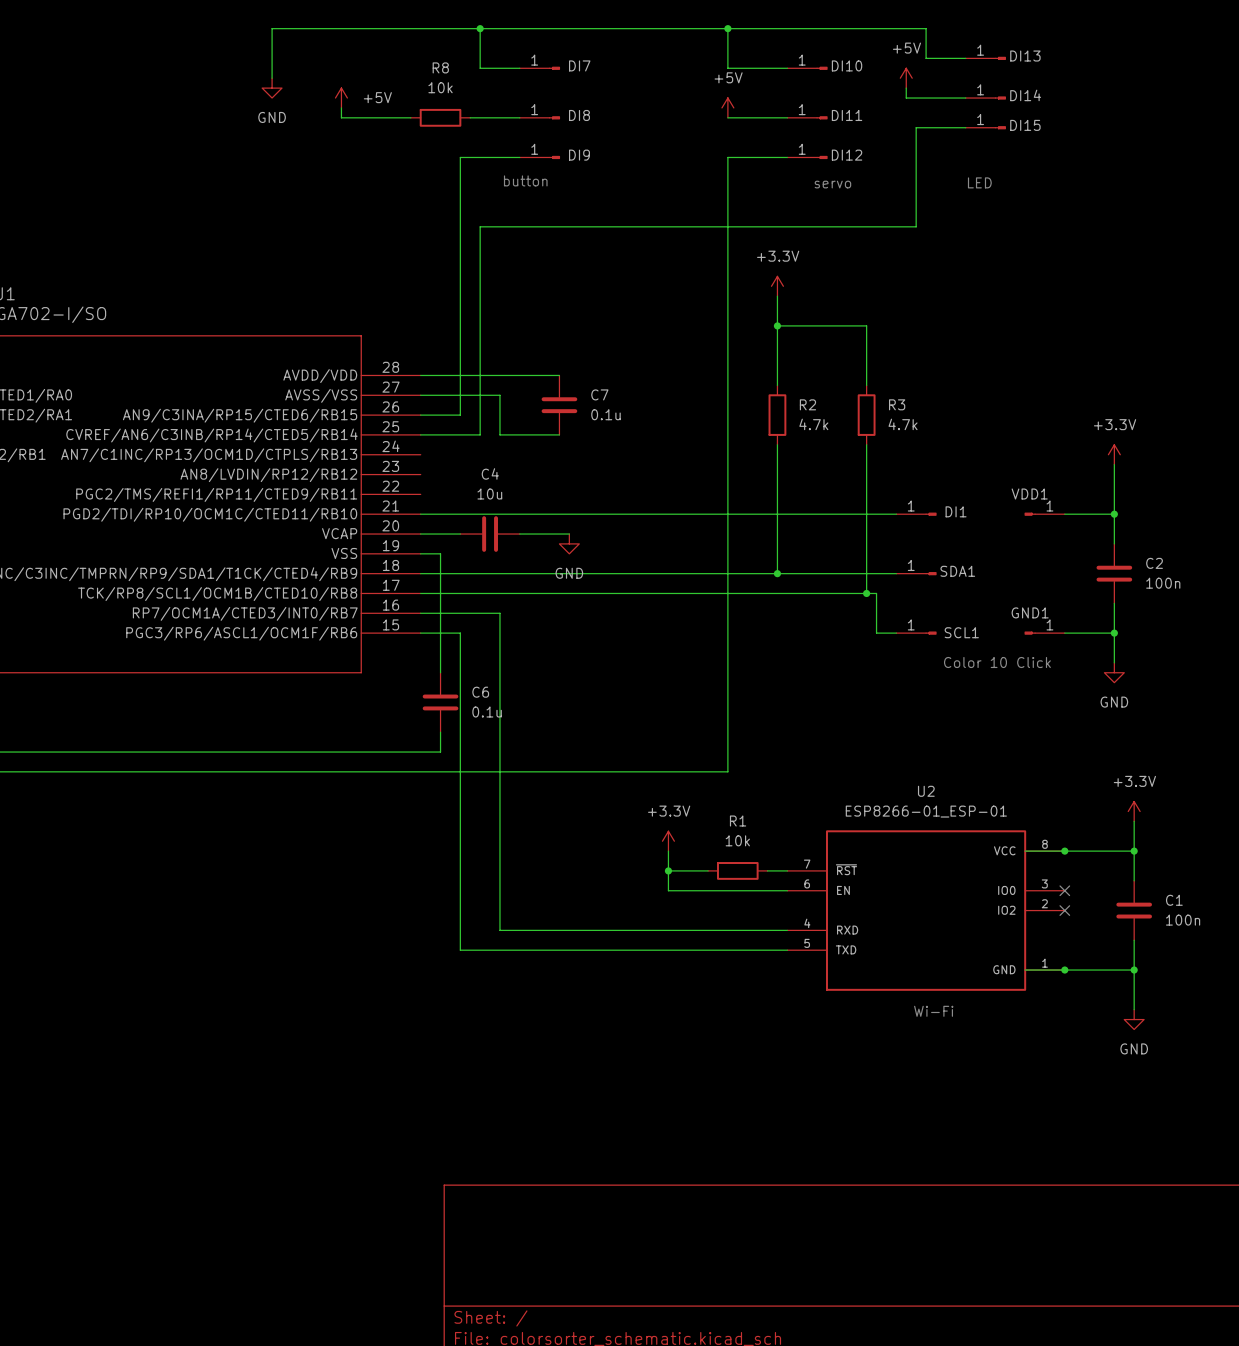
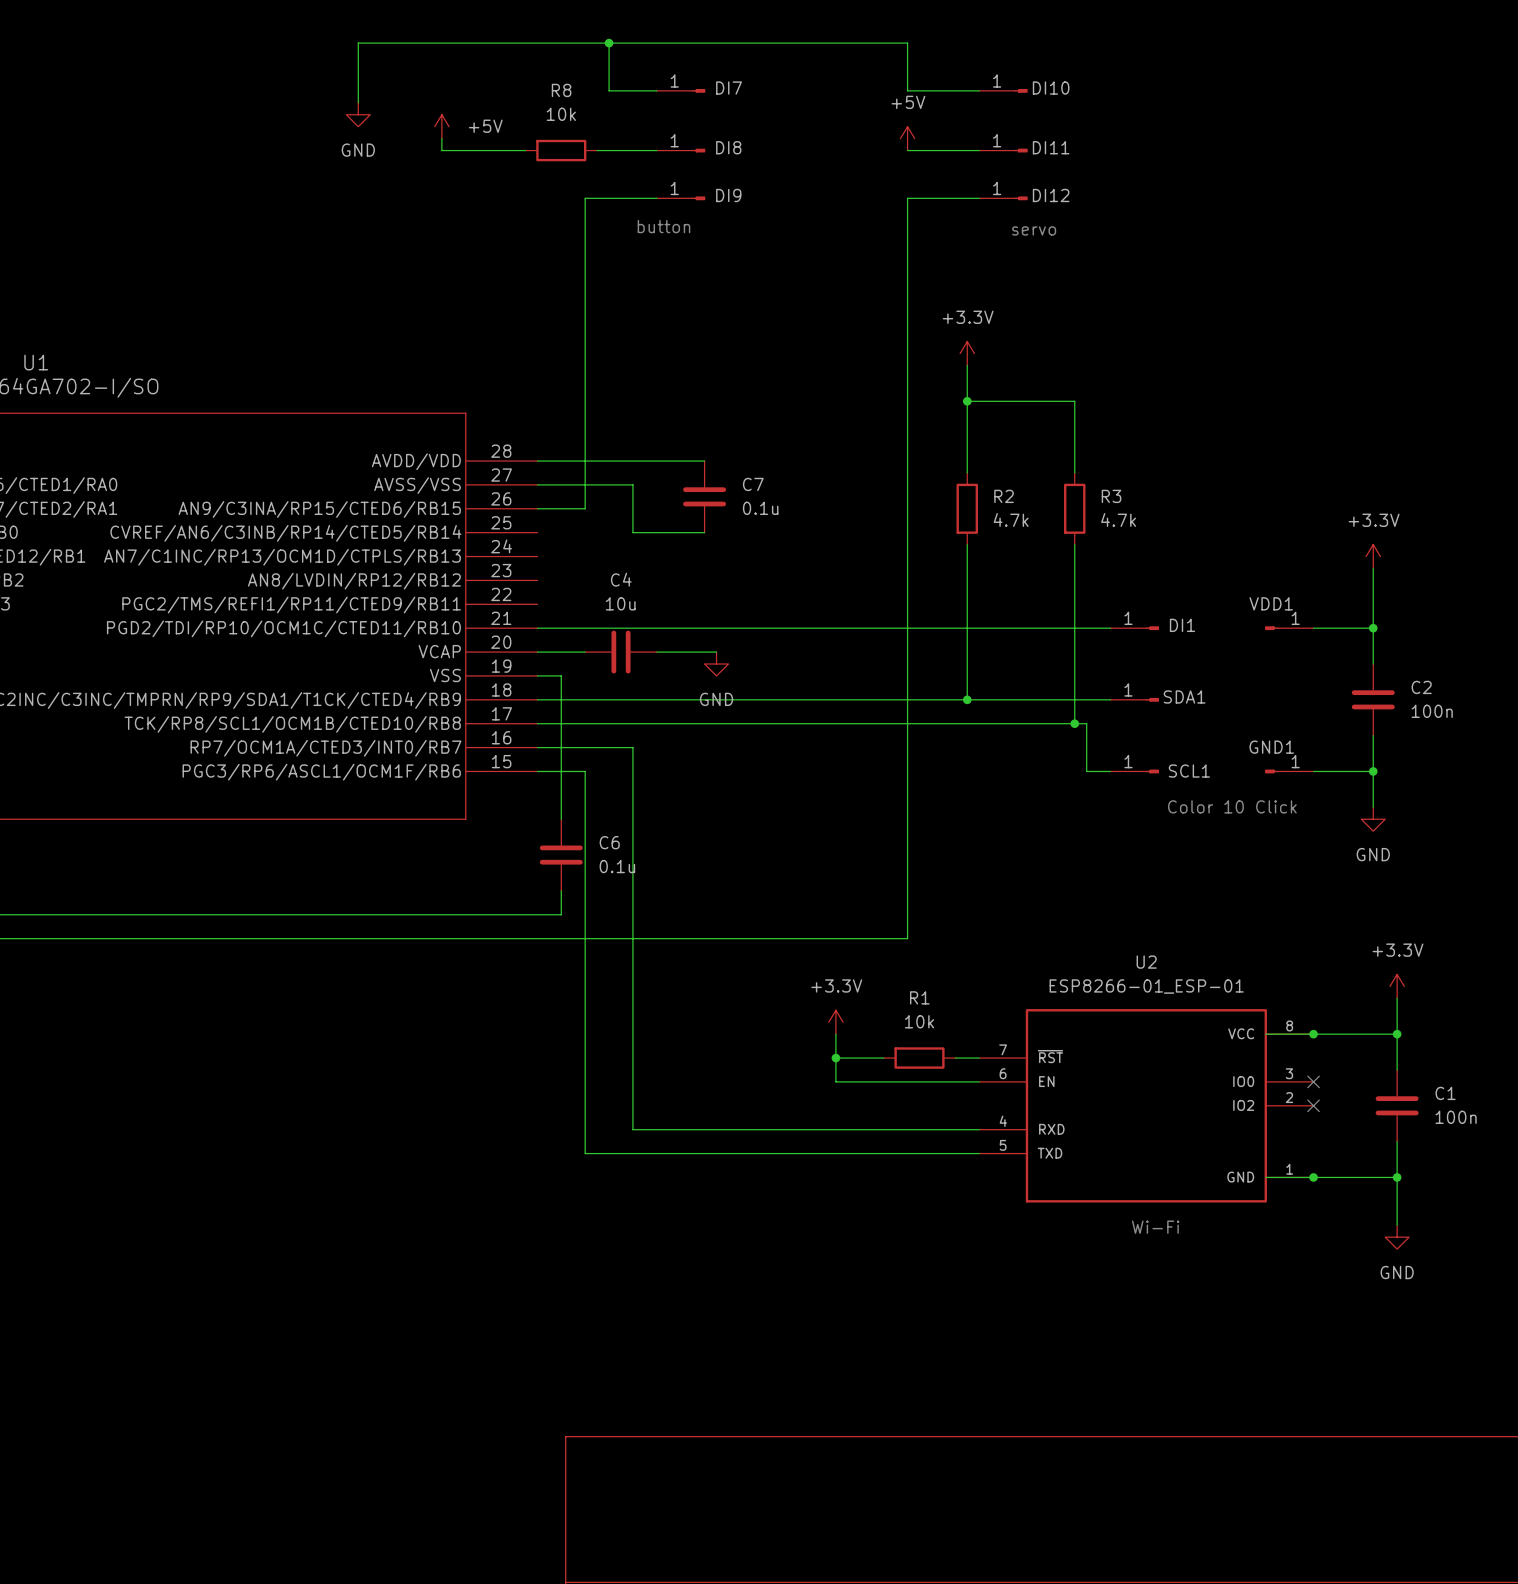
wire: (727, 28) (926, 28) (926, 58) (965, 58) -> none
junction: (727, 28) -> none
DI13: (985, 58) -> none
power symbol: +5V (906, 78) -> none
wire: (906, 88) (906, 98) (965, 98) -> none
DI14: (985, 98) -> none
wire: (965, 127) (916, 127) (916, 226) (480, 226) (480, 434) (420, 434) -> none
DI15: (985, 127) -> none
text: LED (979, 182) -> none

